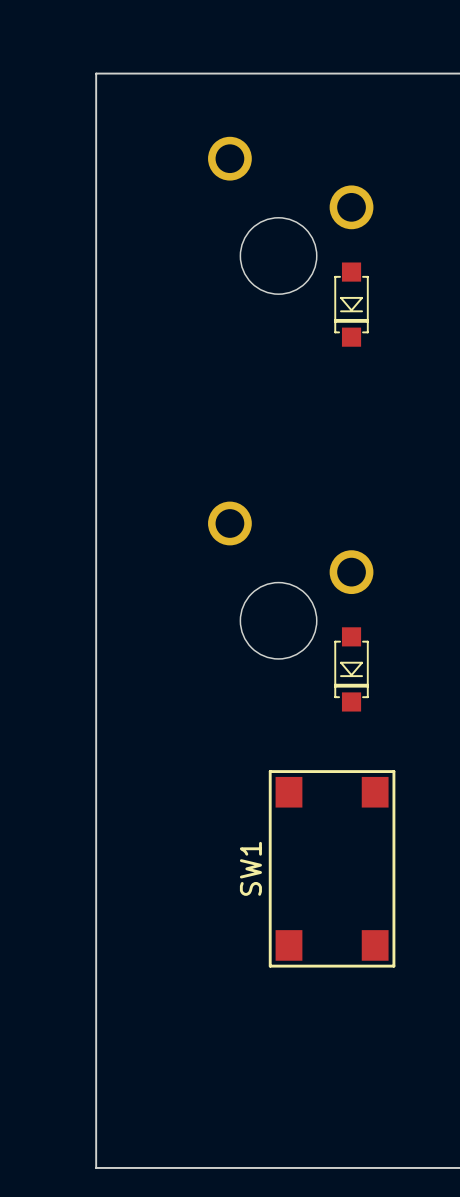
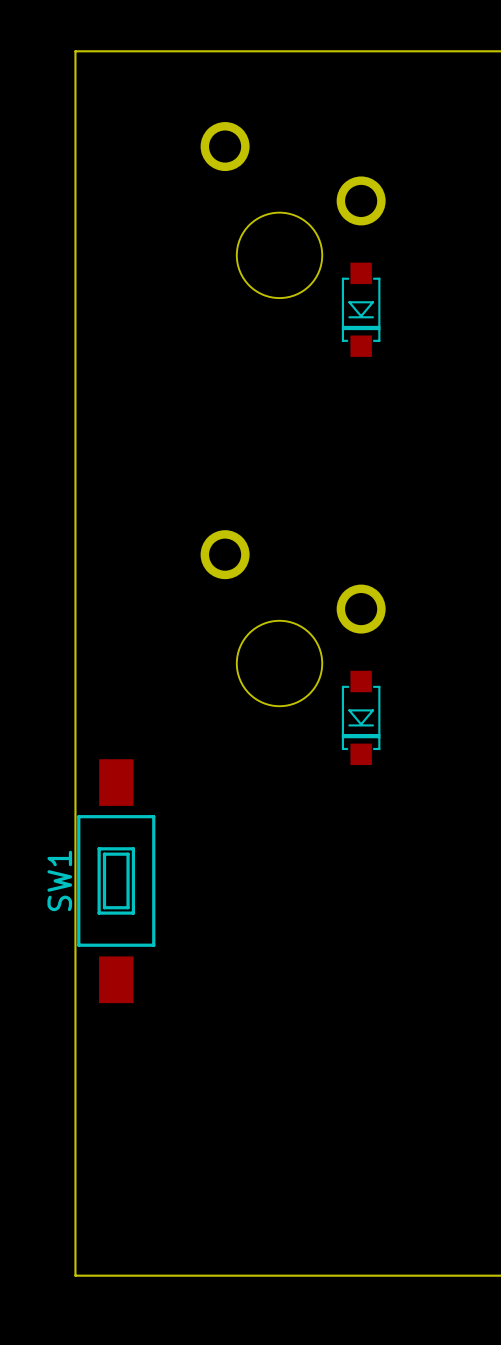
SW1: none -> (116, 881)
part: (332, 868) -> none

